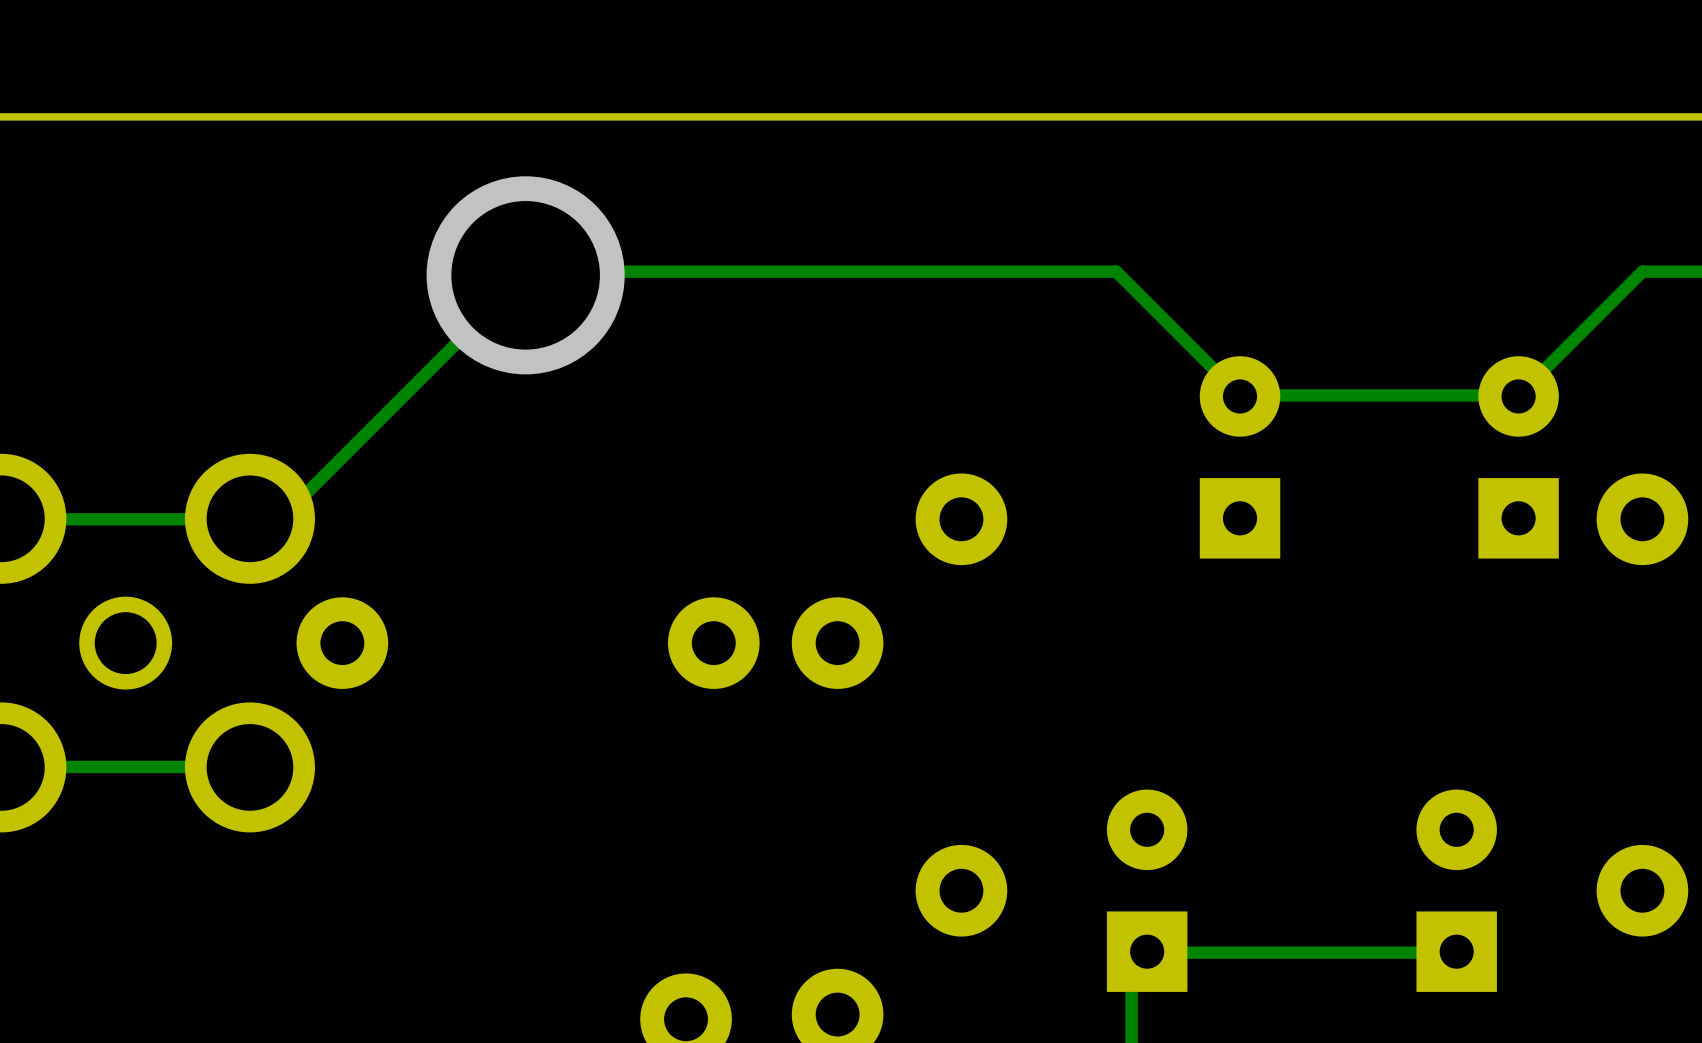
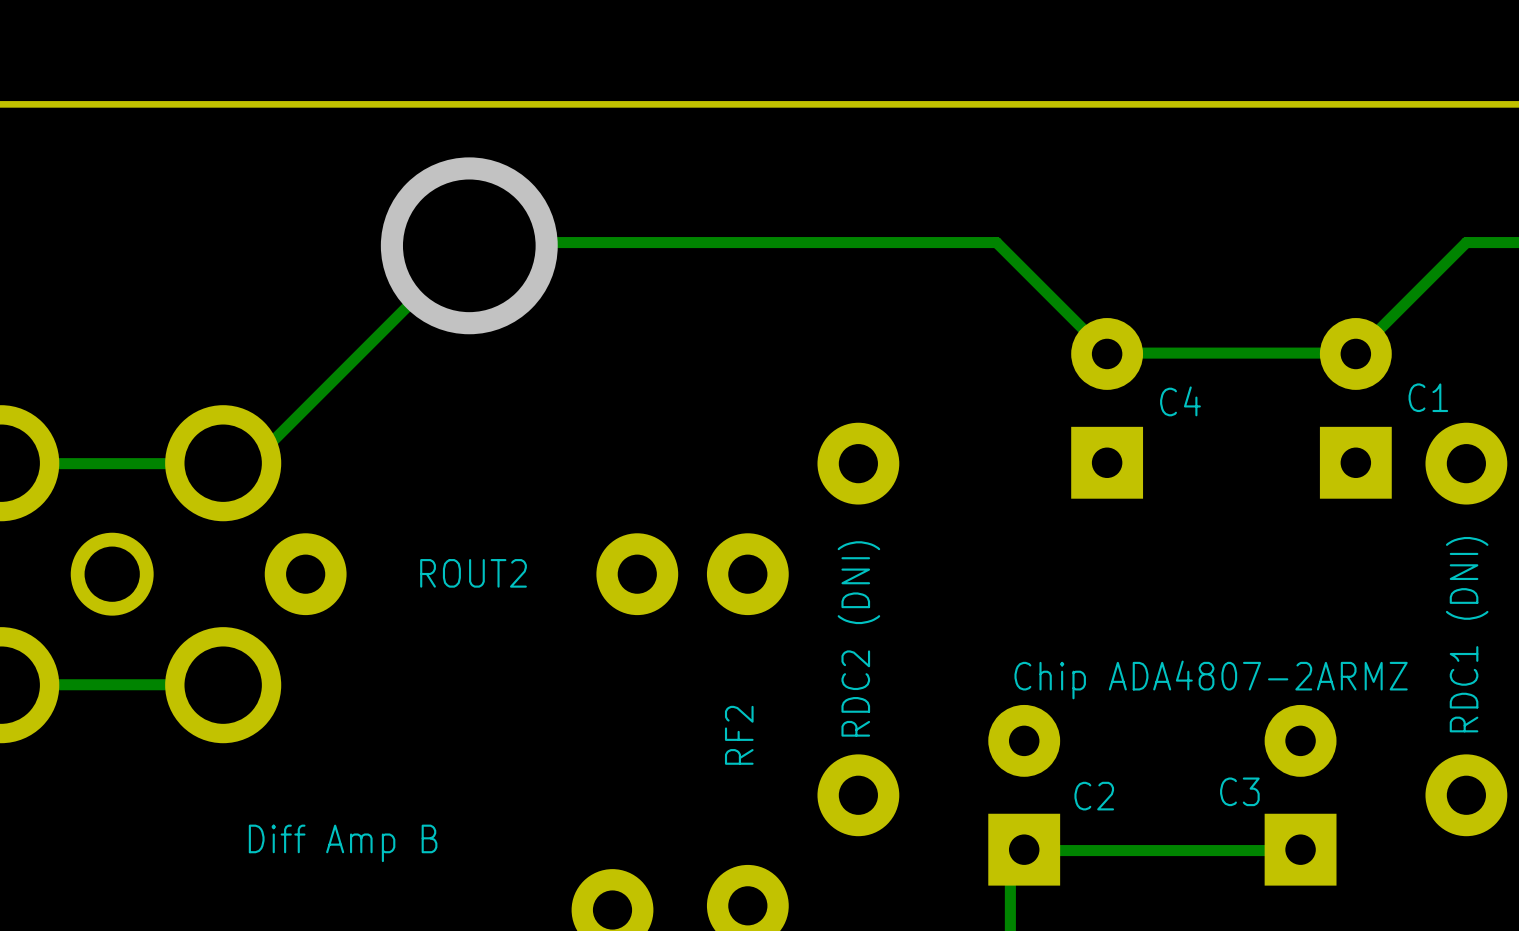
text: none -> C1 (1428, 397)
text: none -> C4 (1180, 401)
text: none -> ROUT2 (473, 573)
text: none -> RDC1 (DNI) (1467, 634)
text: none -> RDC2 (DNI) (858, 638)
text: none -> Chip ADA4807-2ARMZ (1211, 679)
text: none -> RF2 (739, 735)
text: none -> C3 (1239, 791)
text: none -> C2 (1094, 796)
text: none -> Diff Amp B (343, 843)

